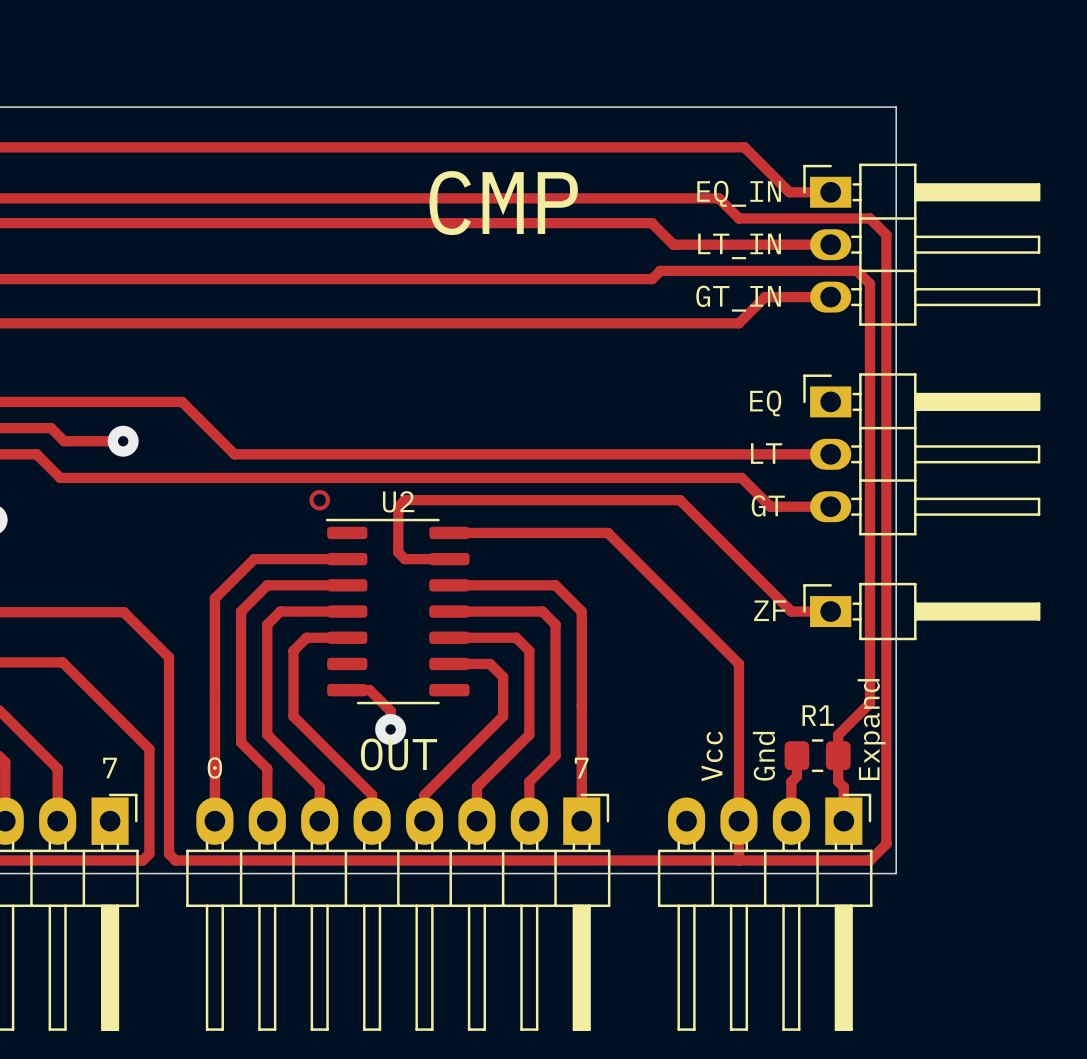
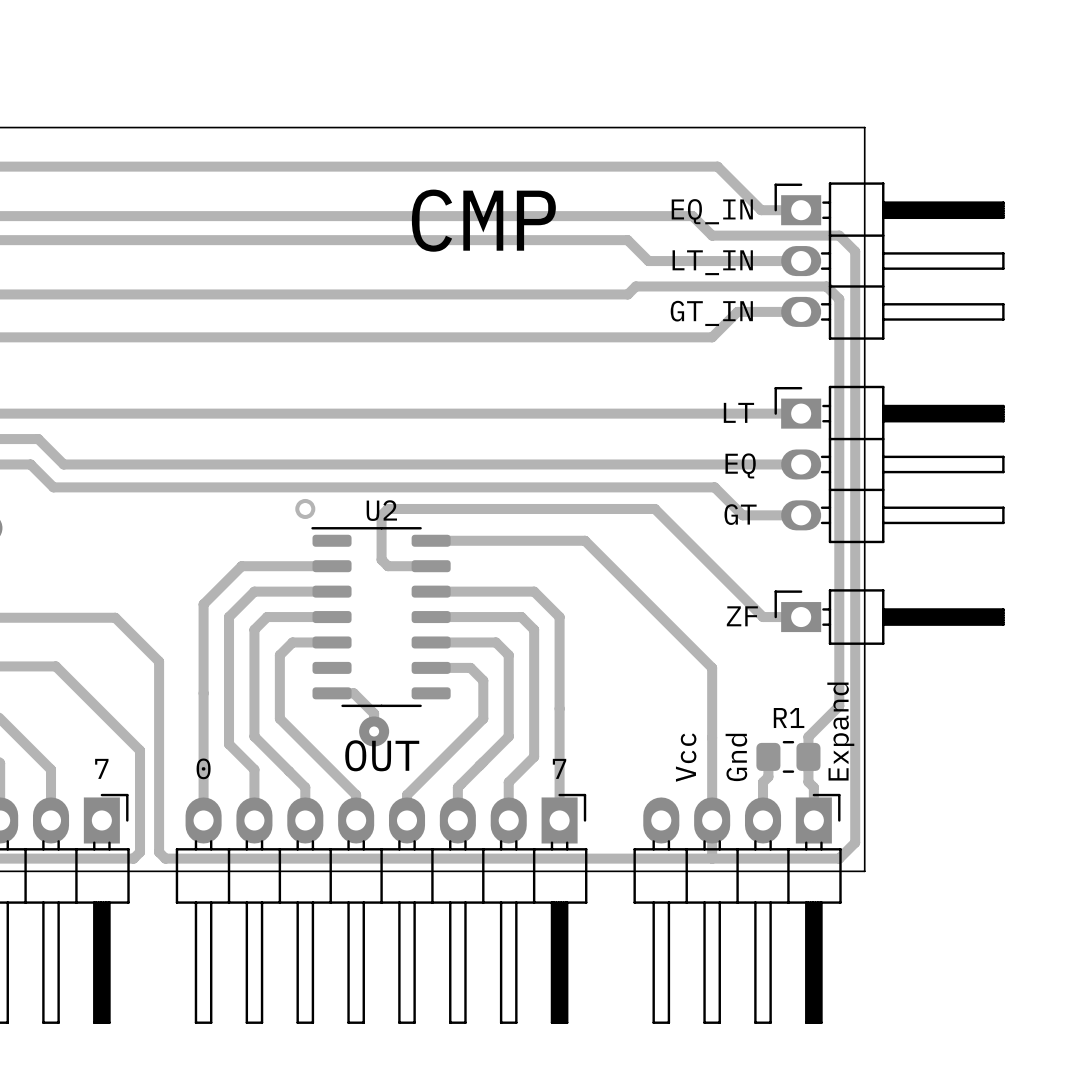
track: (182, 401) (234, 454) -> (171, 413) (801, 413)
text: EQ (765, 403) -> LT (738, 412)
track: (44, 428) (51, 428) (64, 441) (123, 441) -> (38, 439) (63, 464) (222, 464)
via: (123, 441) -> none
text: LT (766, 453) -> EQ (740, 465)

